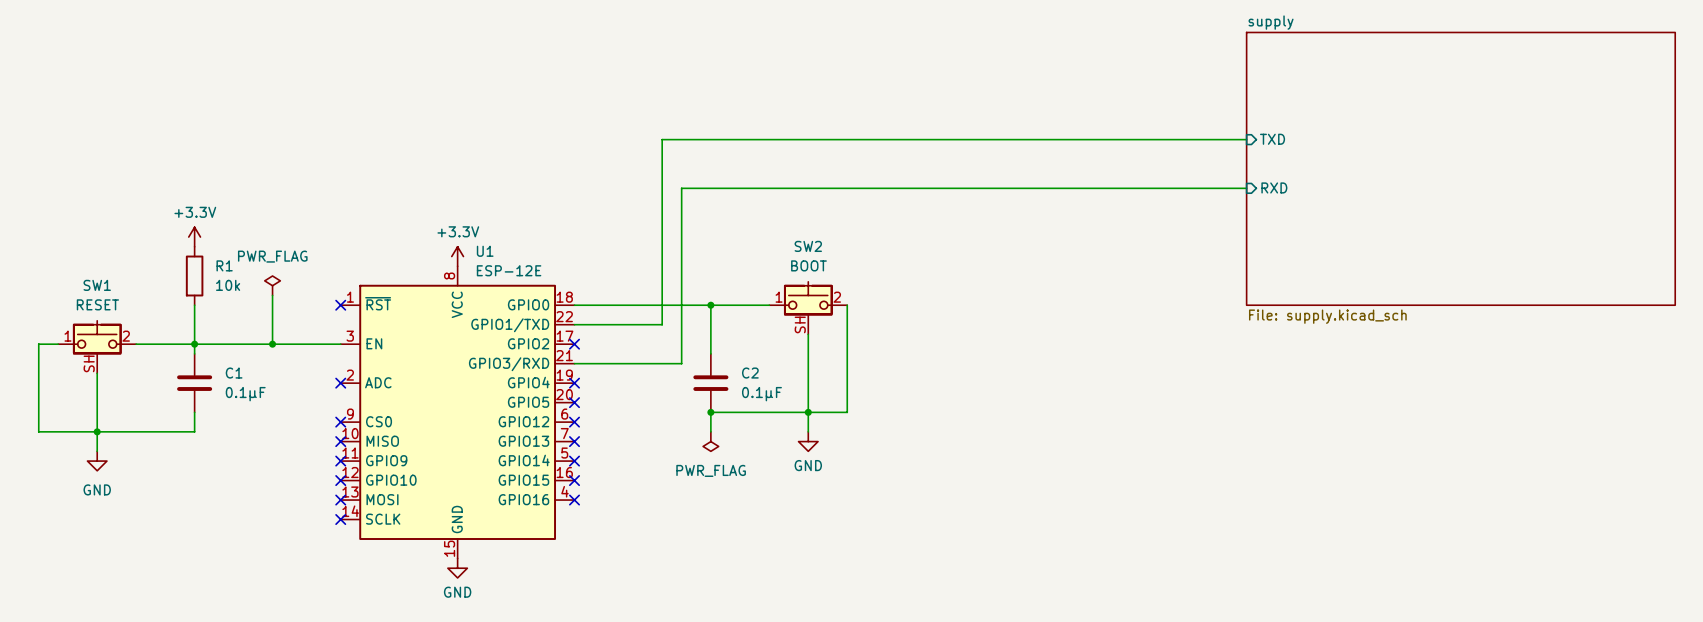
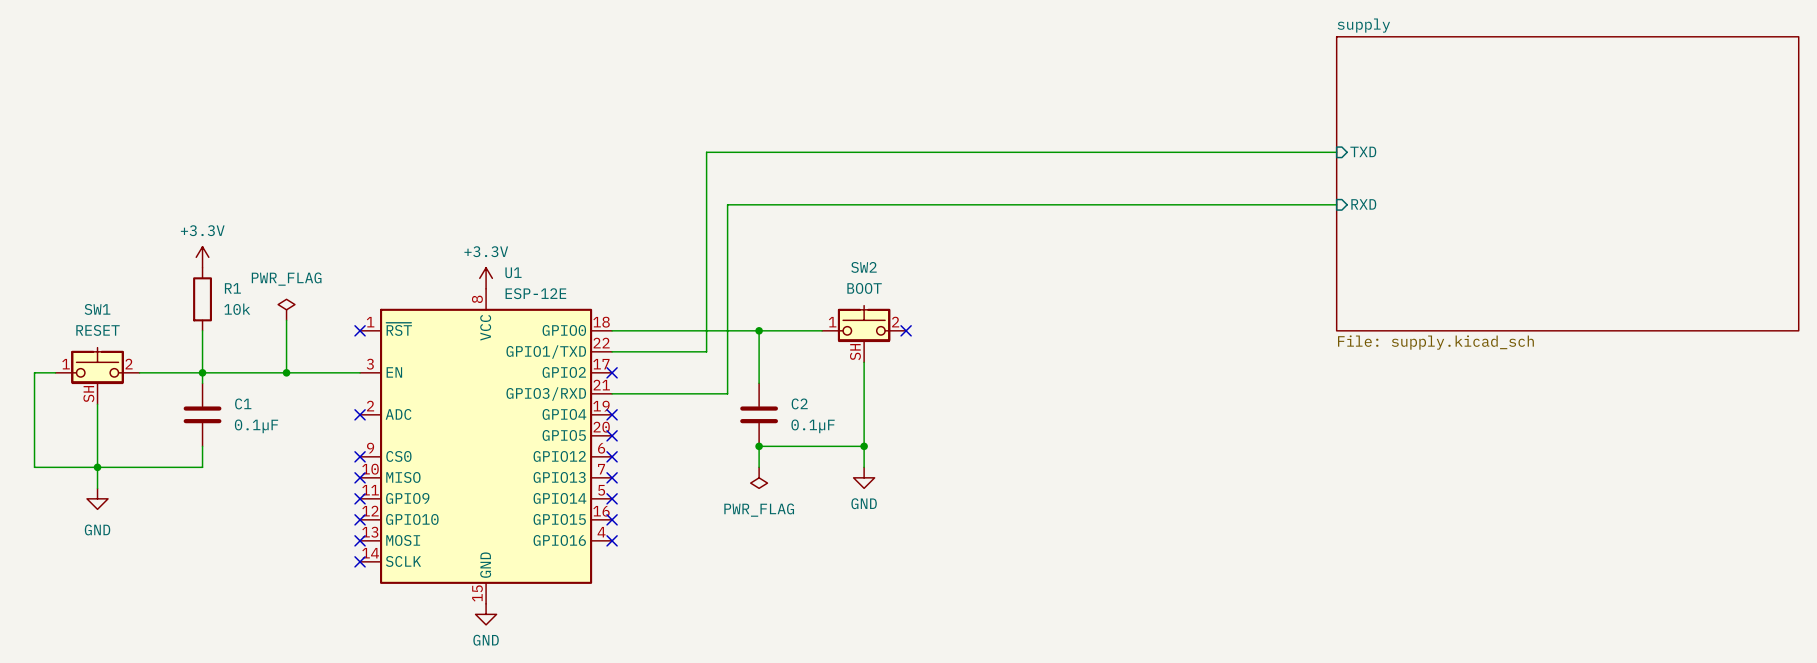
wire: (847, 305) (847, 412) (808, 412) -> none
no-connect mark: none -> (906, 330)

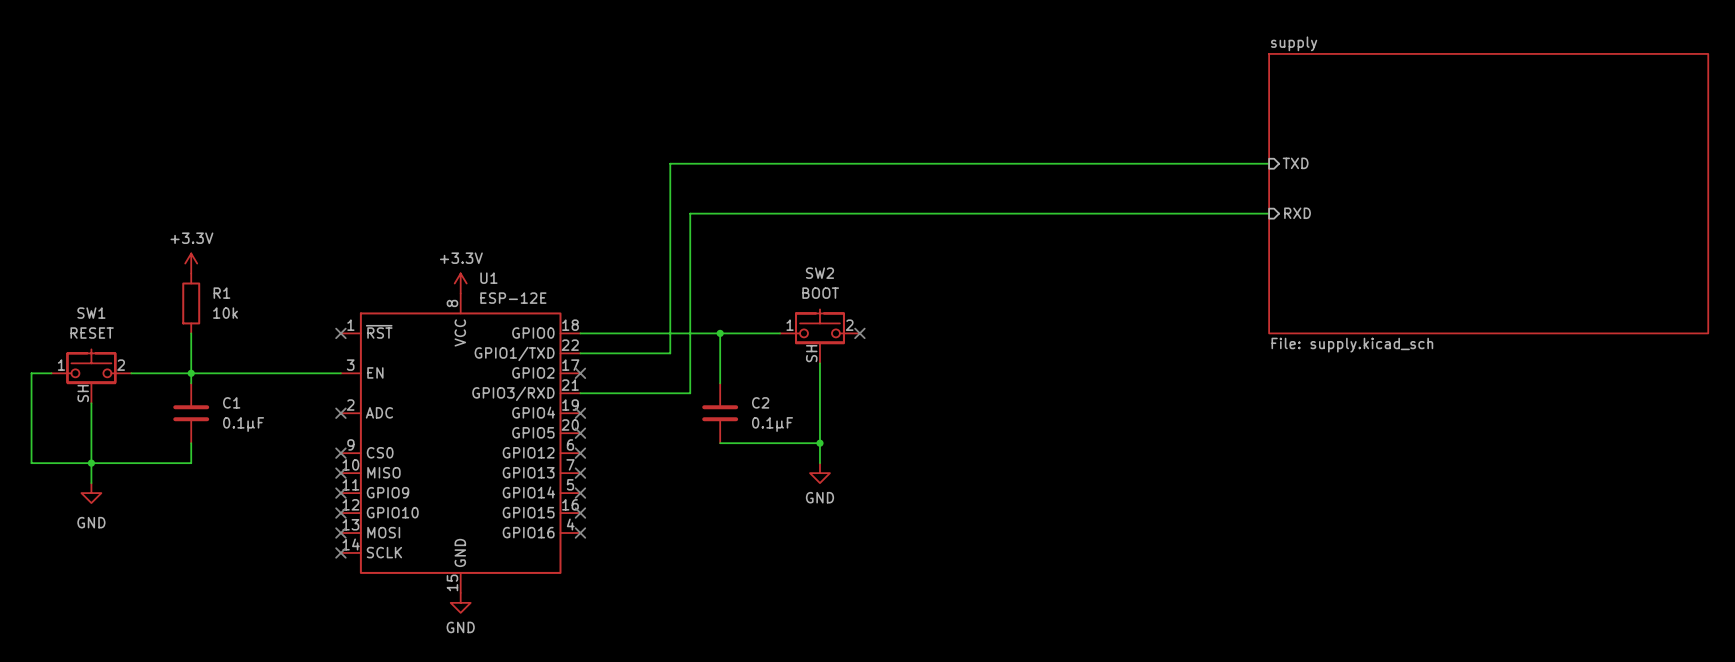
power symbol: PWR_FLAG (286, 309) -> none
wire: (286, 320) (286, 372) -> none
junction: (286, 372) -> none
wire: (759, 446) (759, 467) -> none
junction: (759, 446) -> none
power symbol: PWR_FLAG (759, 477) -> none

